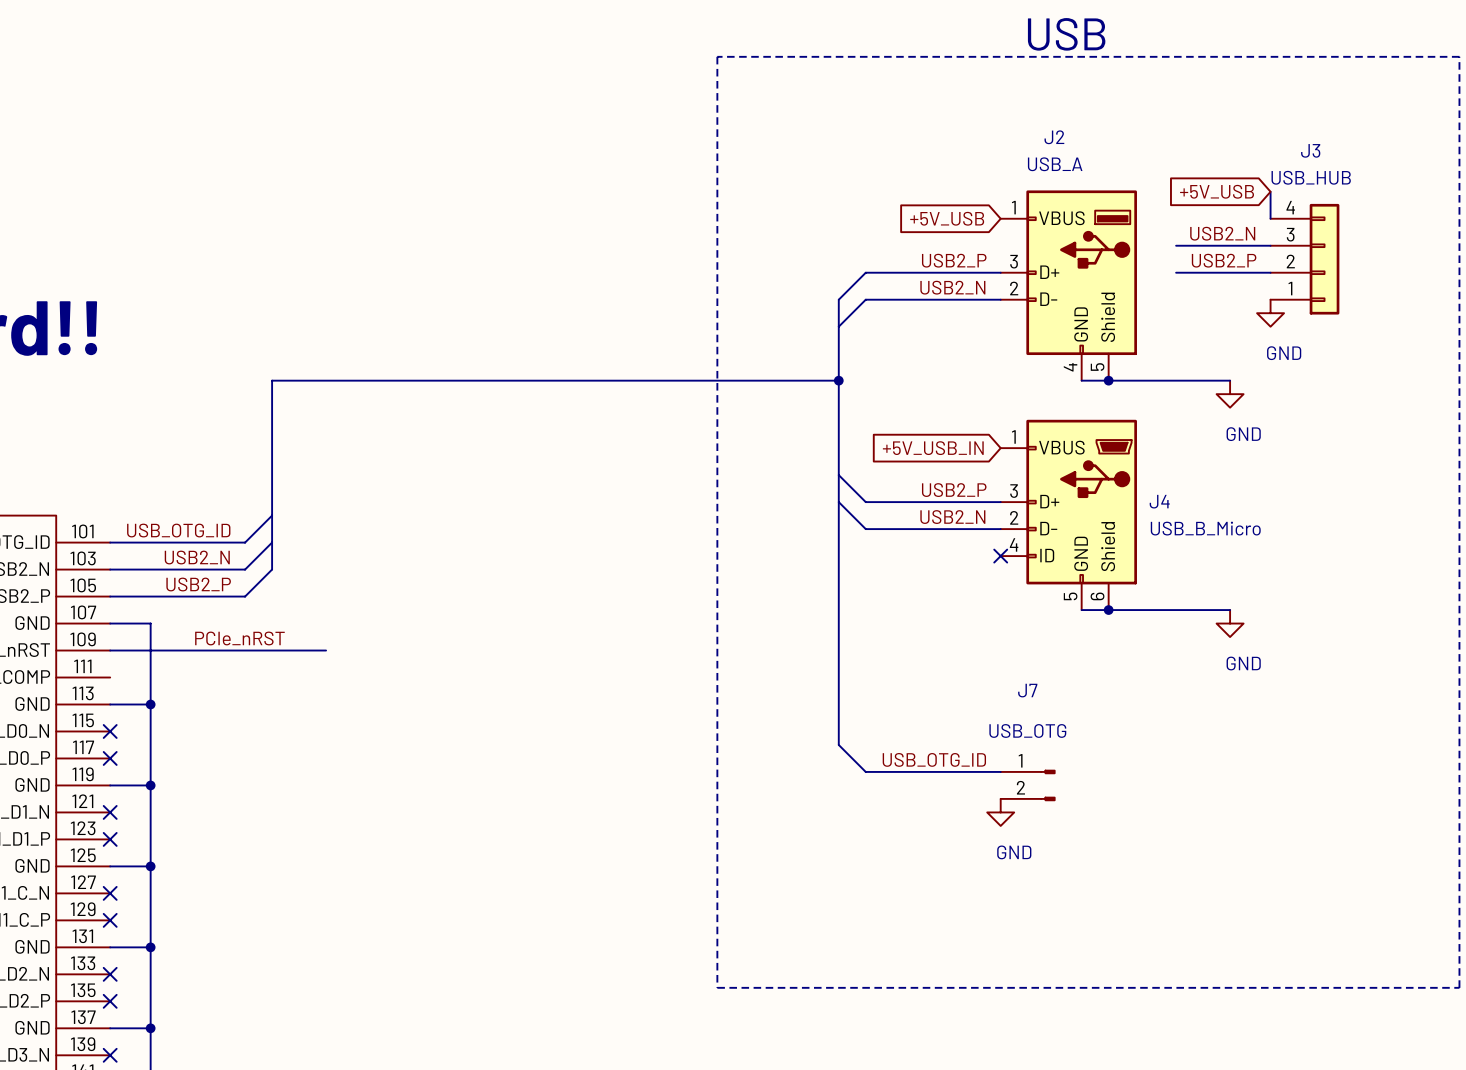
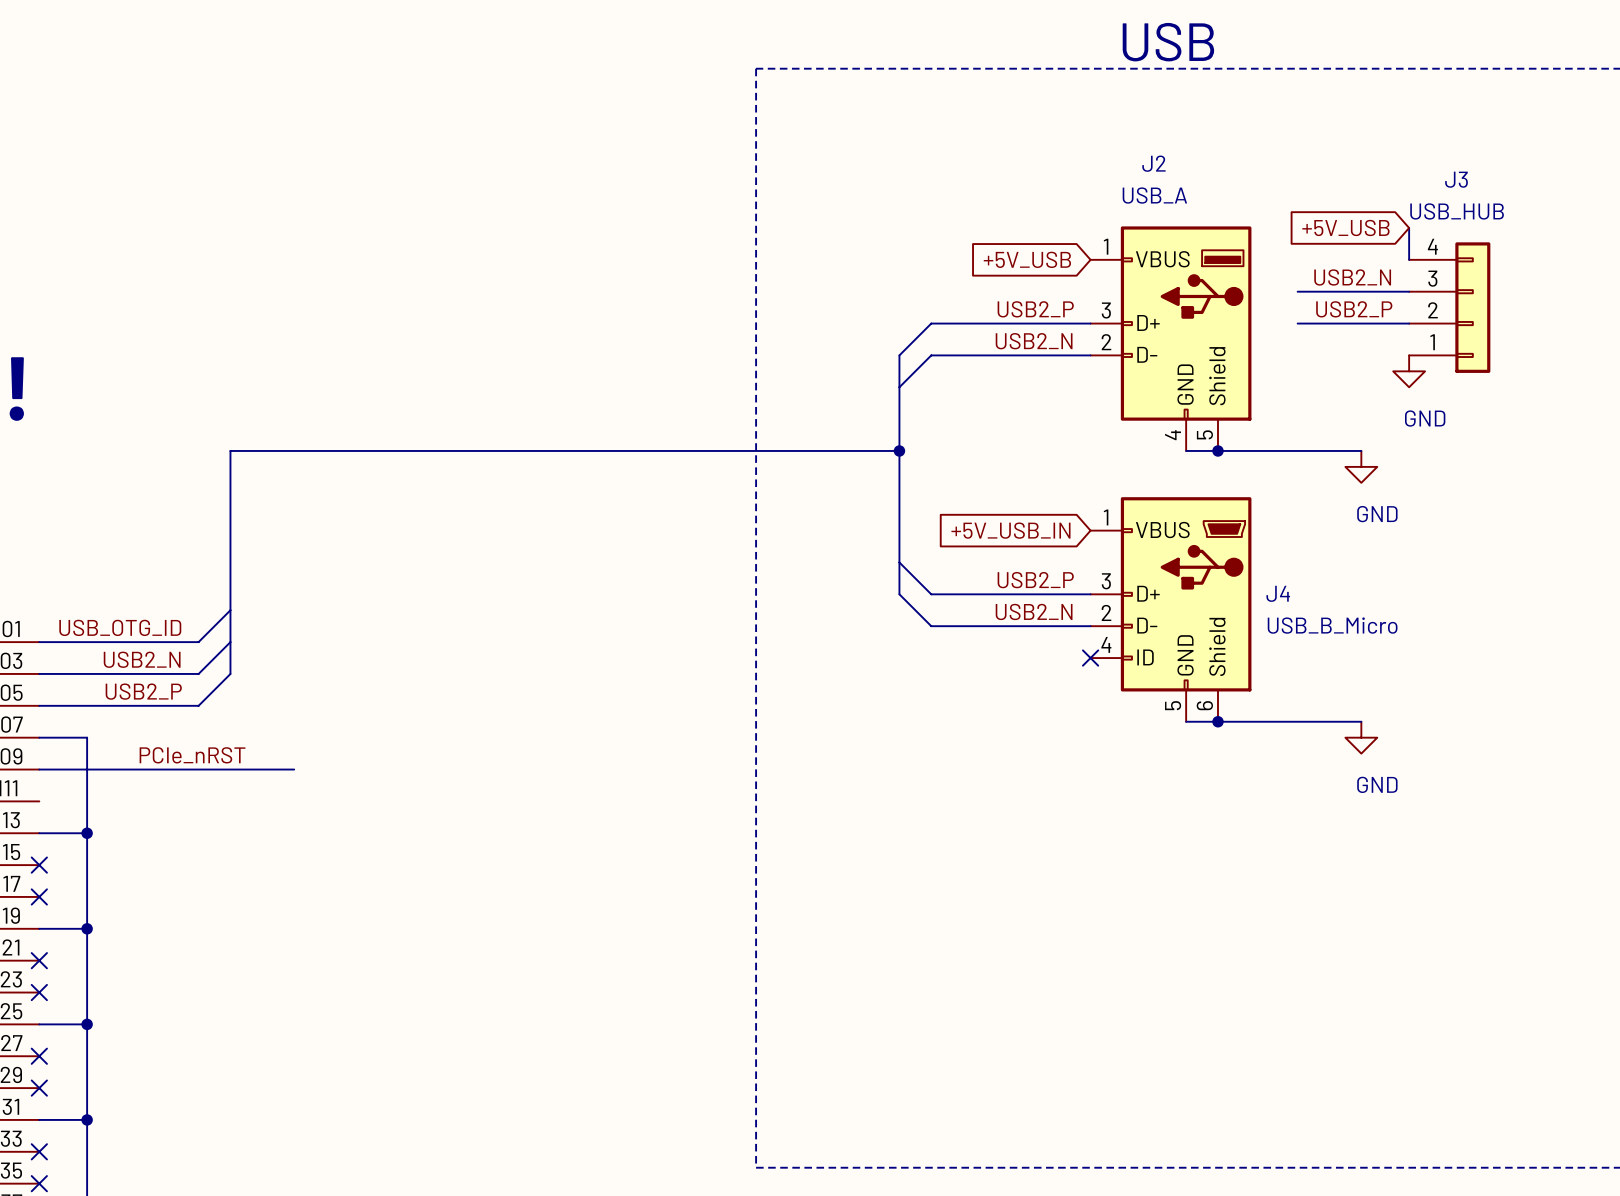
bus: (838, 502) (838, 744) -> none
wire: (838, 744) (865, 771) (1000, 771) -> none
label: USB_OTG_ID (934, 759) -> none
J7: USB_OTG (1028, 785) -> none
power symbol: GND (1000, 812) -> none

